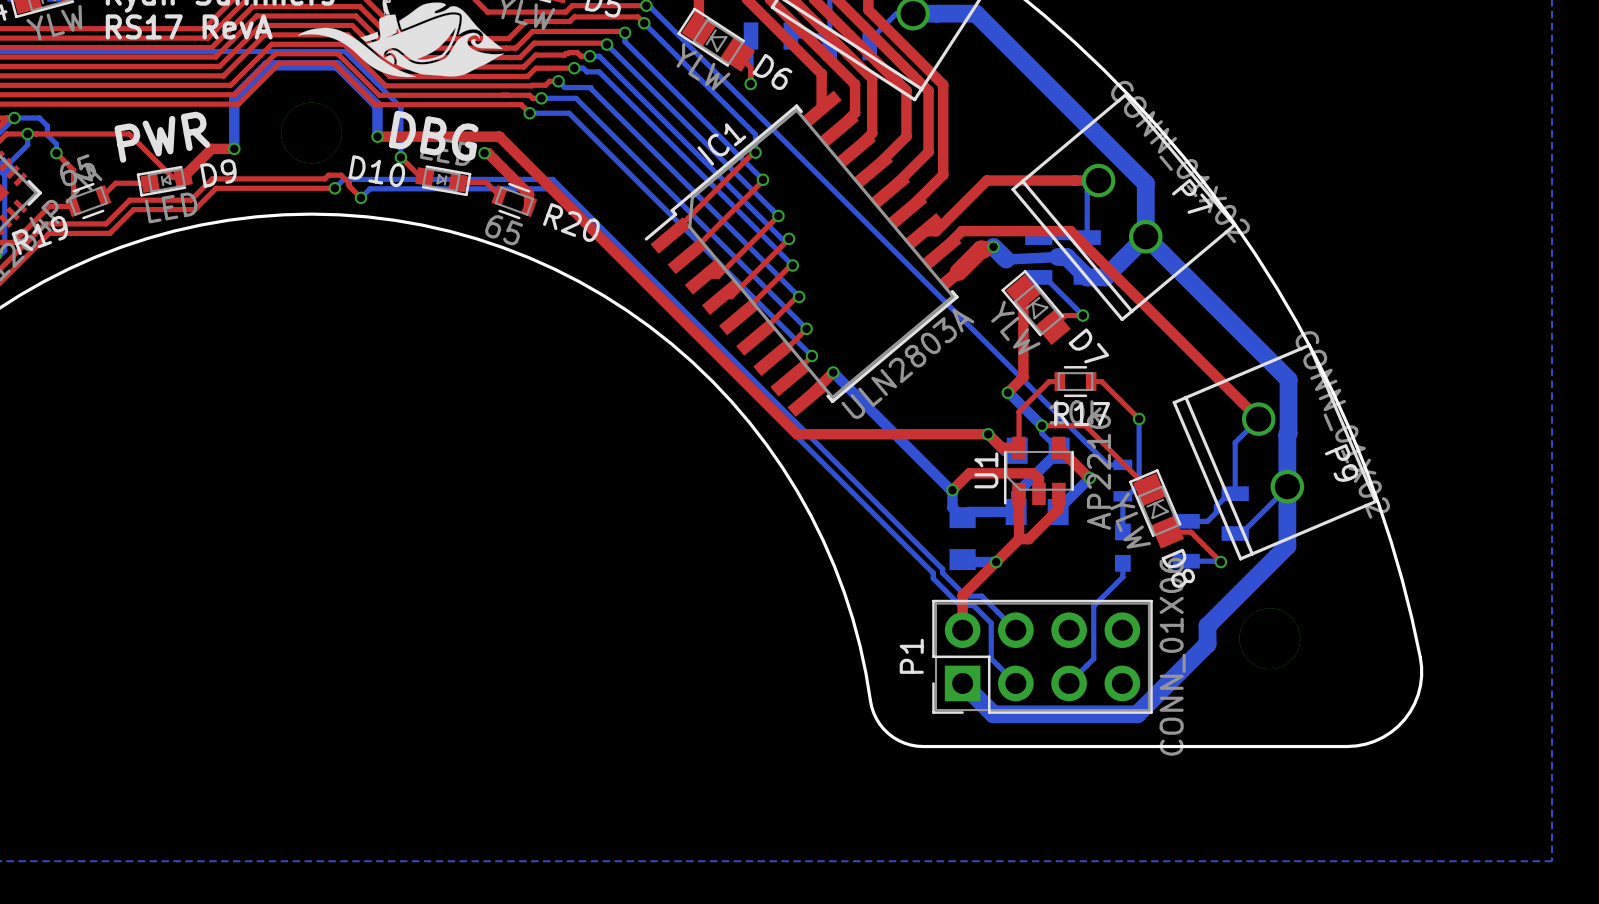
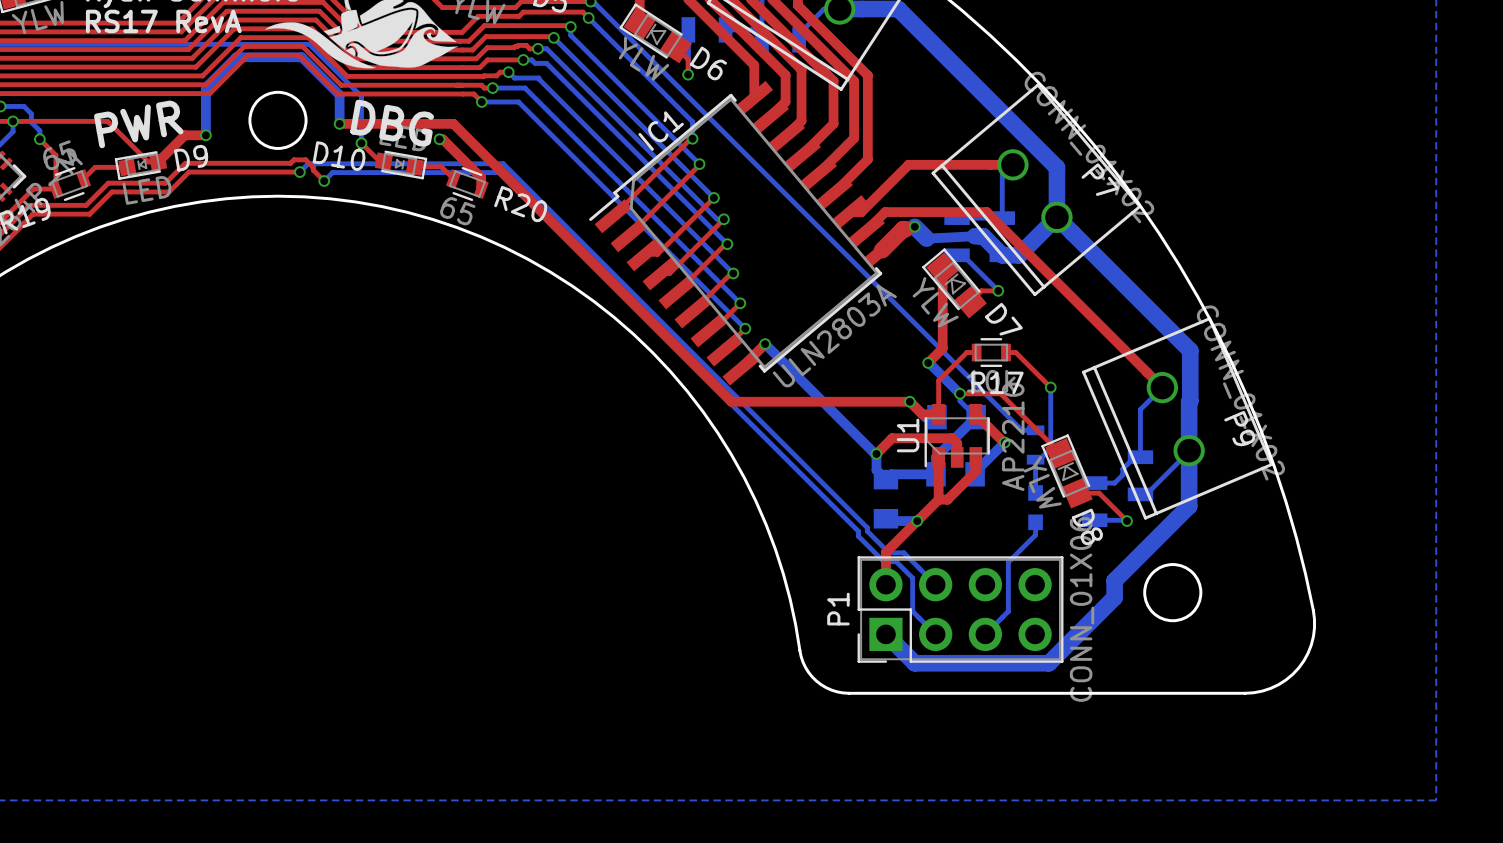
round board edge: none -> [248, 90, 308, 150]
round board edge: none -> [1143, 563, 1203, 623]

